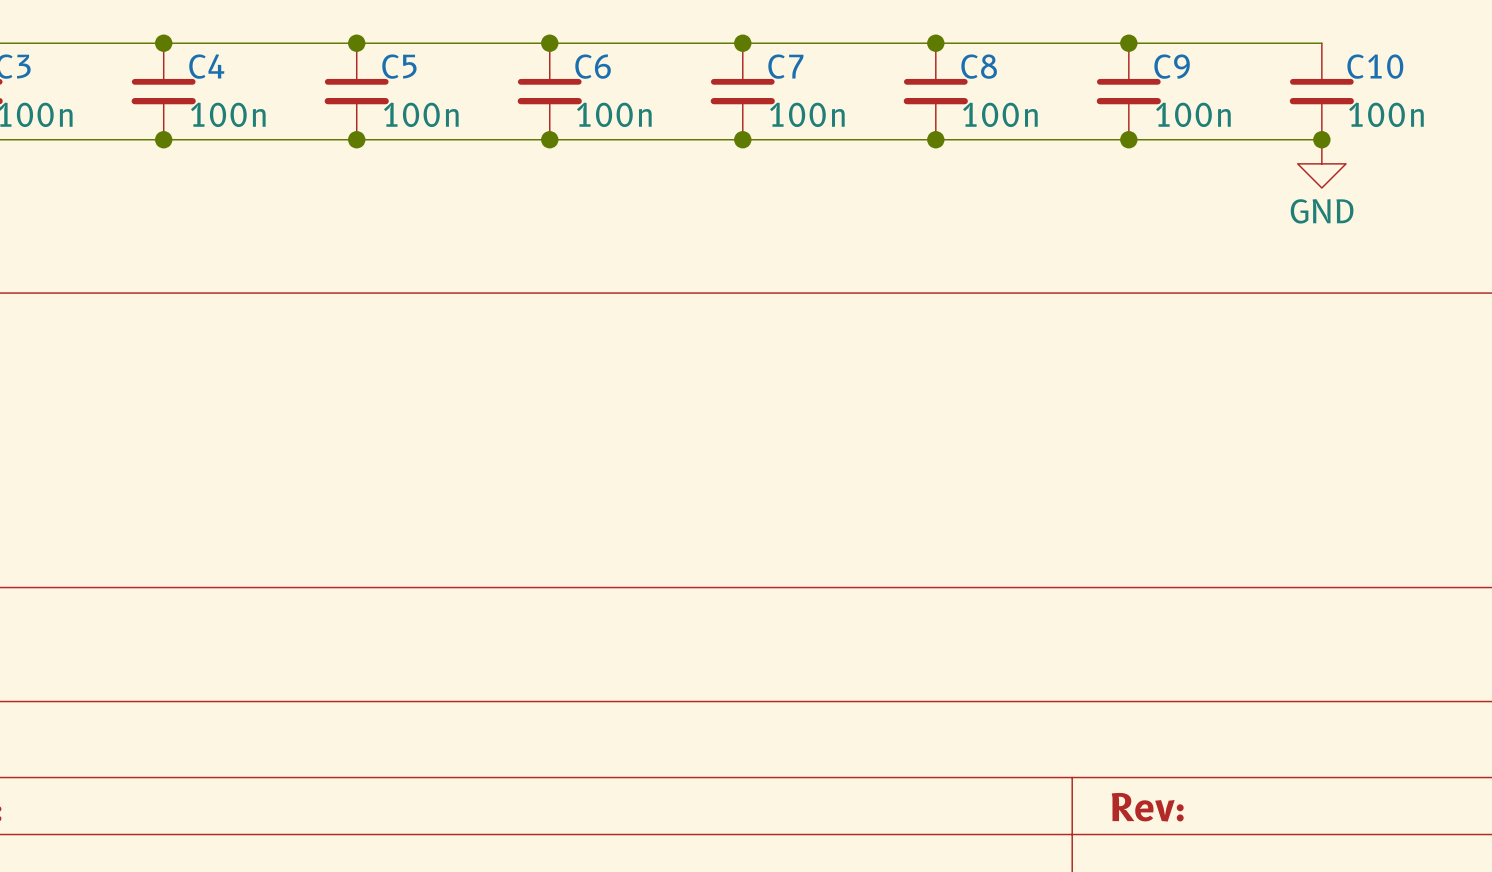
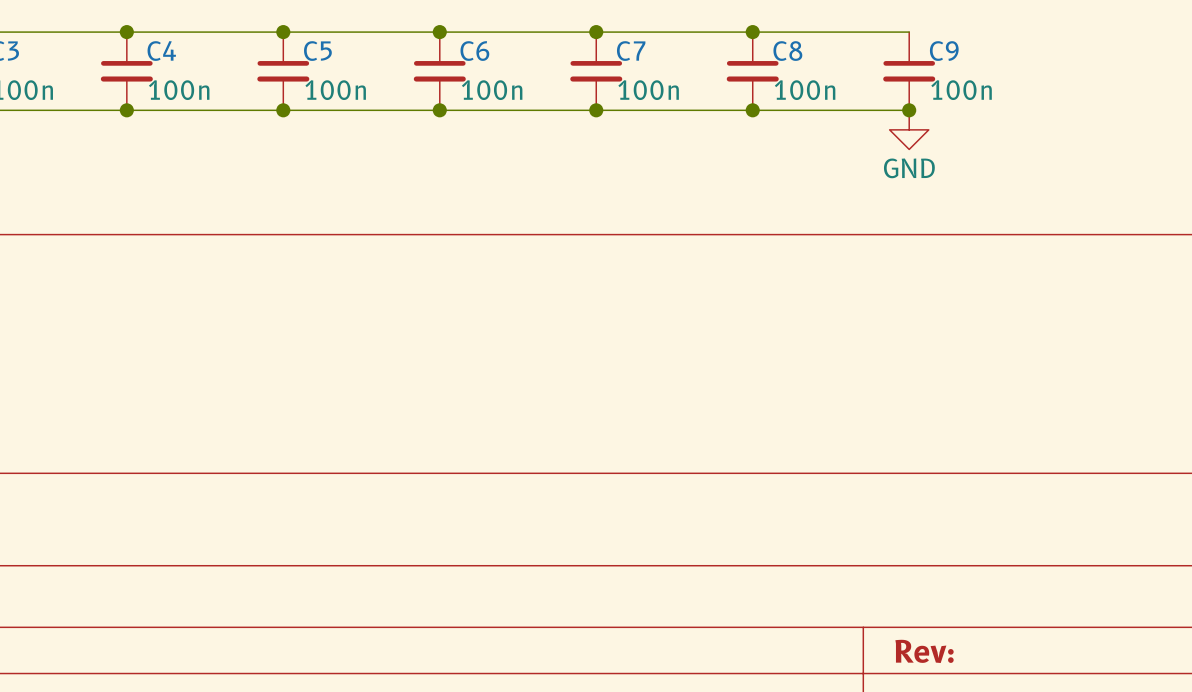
wire: (1128, 43) (1321, 43) -> none
junction: (1128, 43) -> none
C10: 100n (1321, 91) -> none
wire: (1128, 139) (1321, 139) -> none
junction: (1321, 139) -> none
power symbol position: GND (1321, 163) -> GND (909, 129)

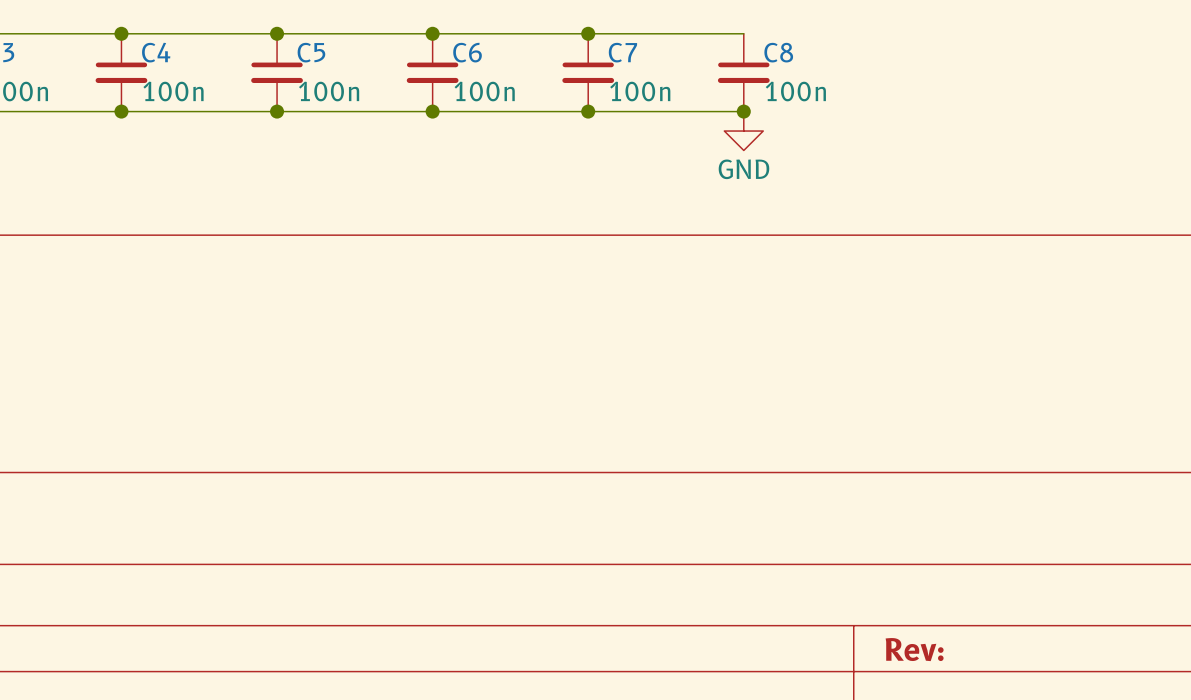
wire: (752, 32) (909, 32) -> none
junction: (752, 32) -> none
C9: 100n (909, 71) -> none
wire: (752, 110) (909, 110) -> none
junction: (909, 110) -> none
power symbol position: GND (909, 129) -> GND (743, 131)

